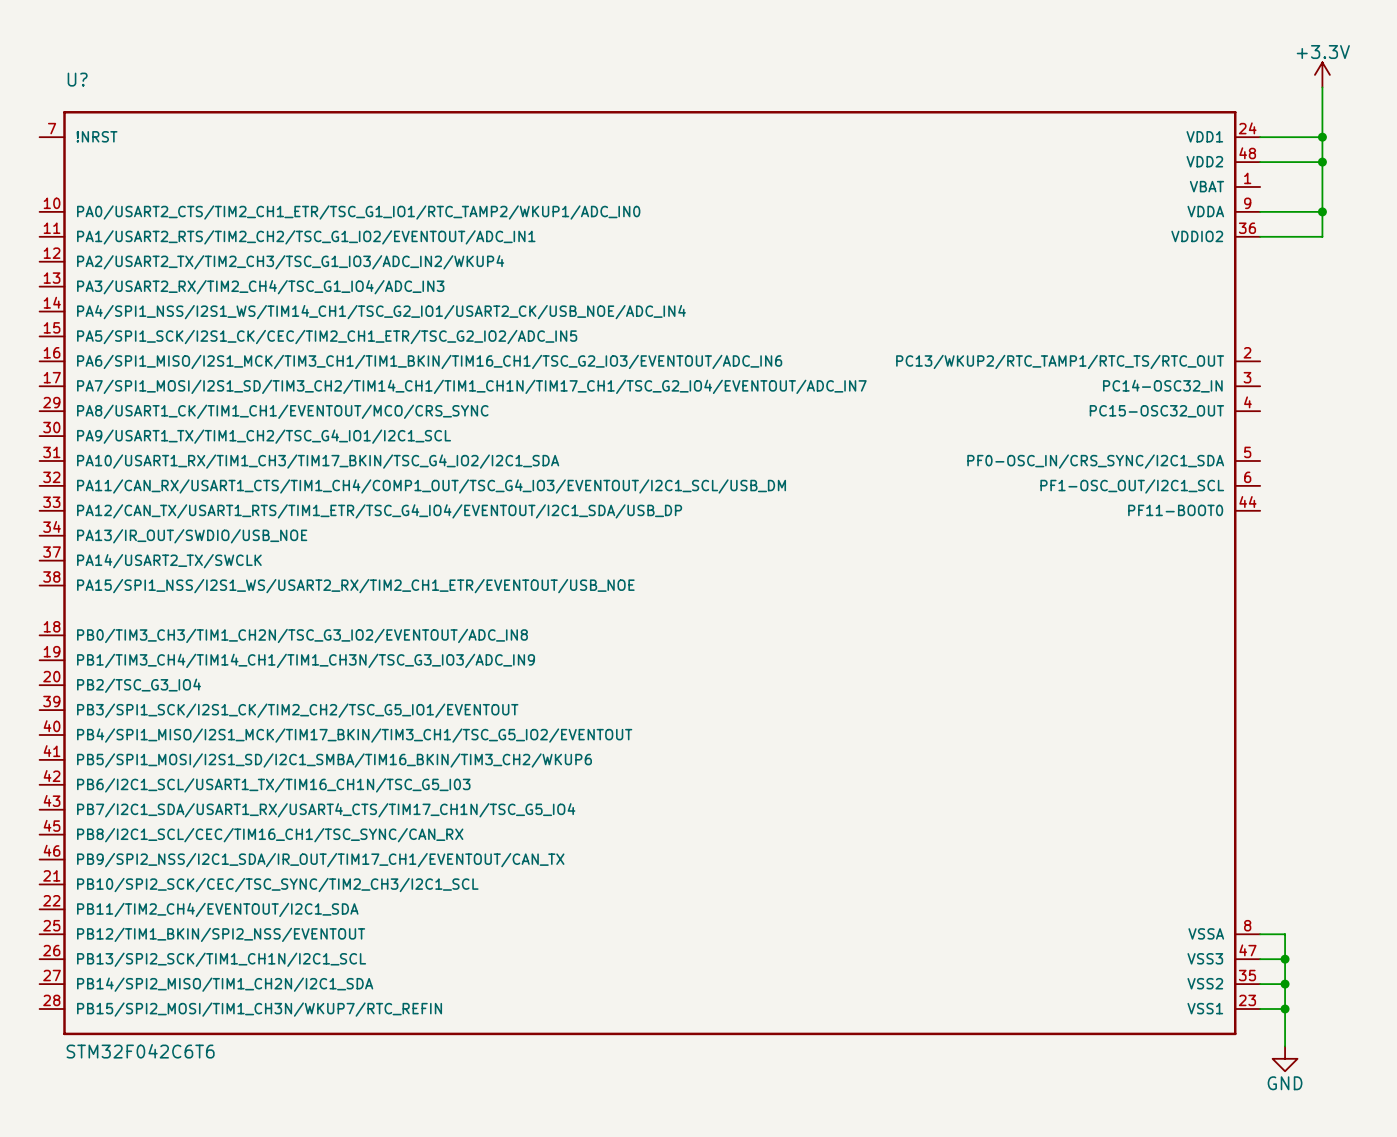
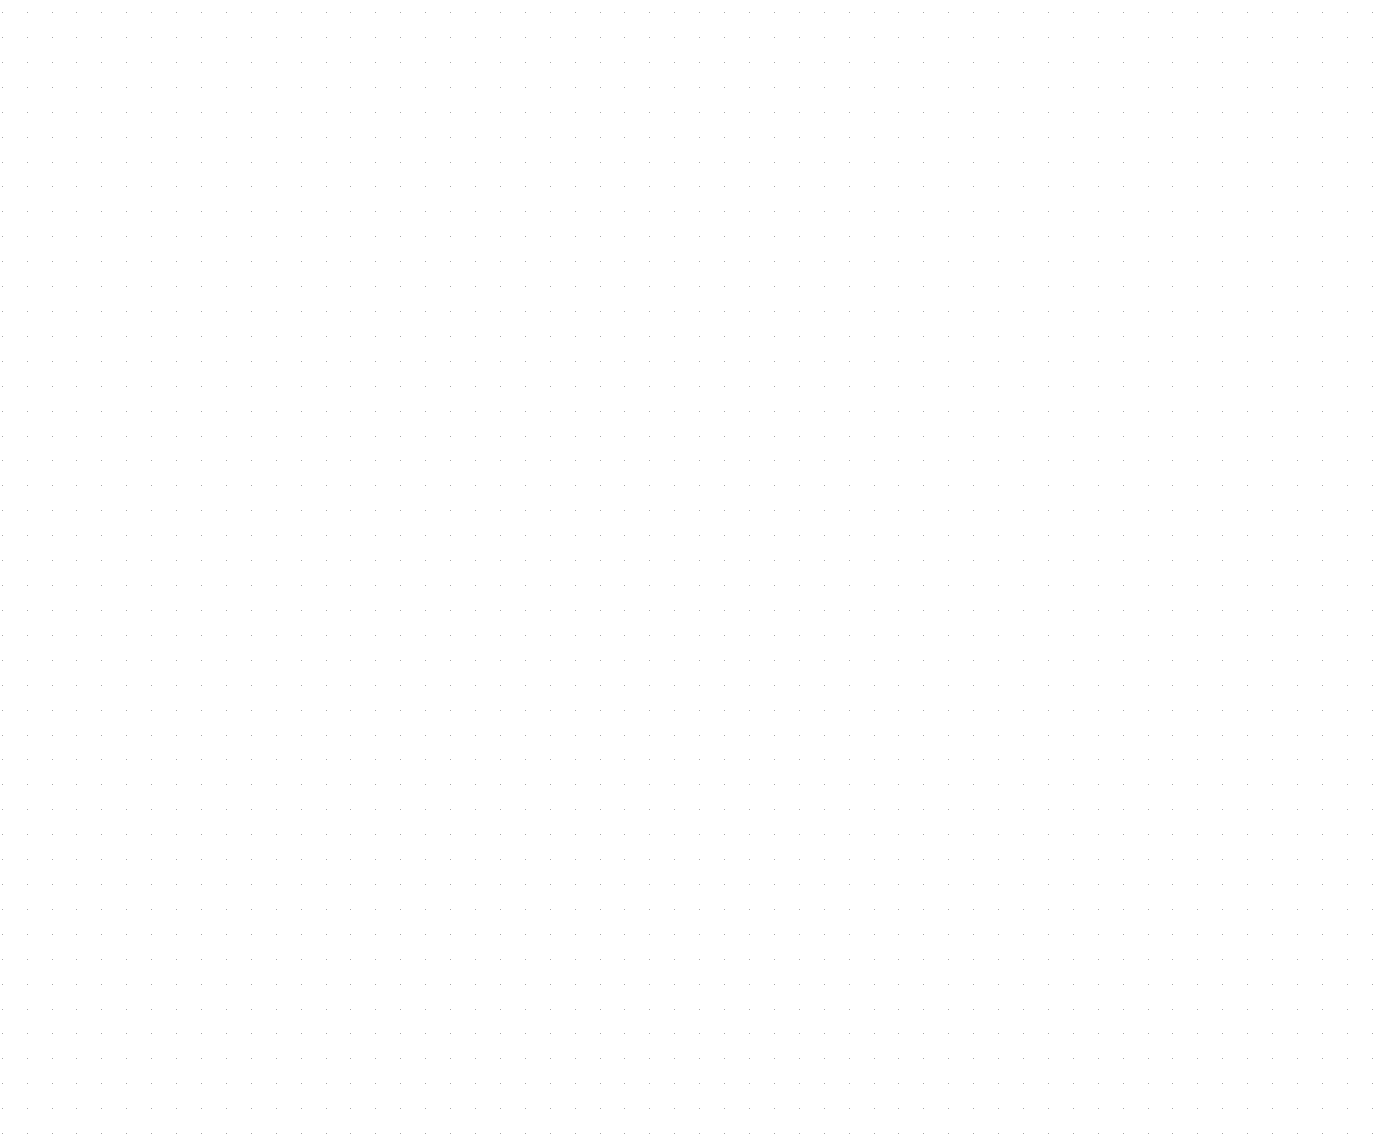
power symbol: +3.3V (1322, 74) -> none
wire: (1322, 87) (1322, 236) (1260, 236) -> none
wire: (1260, 137) (1322, 137) -> none
junction: (1322, 137) -> none
wire: (1260, 162) (1322, 162) -> none
junction: (1322, 162) -> none
wire: (1260, 211) (1322, 211) -> none
junction: (1322, 211) -> none
U?: STM32F042C6T6 (649, 573) -> none
wire: (1260, 934) (1285, 934) (1285, 1046) -> none
wire: (1260, 959) (1285, 959) -> none
junction: (1285, 959) -> none
wire: (1260, 984) (1285, 984) -> none
junction: (1285, 984) -> none
wire: (1260, 1009) (1285, 1009) -> none
junction: (1285, 1009) -> none
power symbol: GND (1285, 1058) -> none

